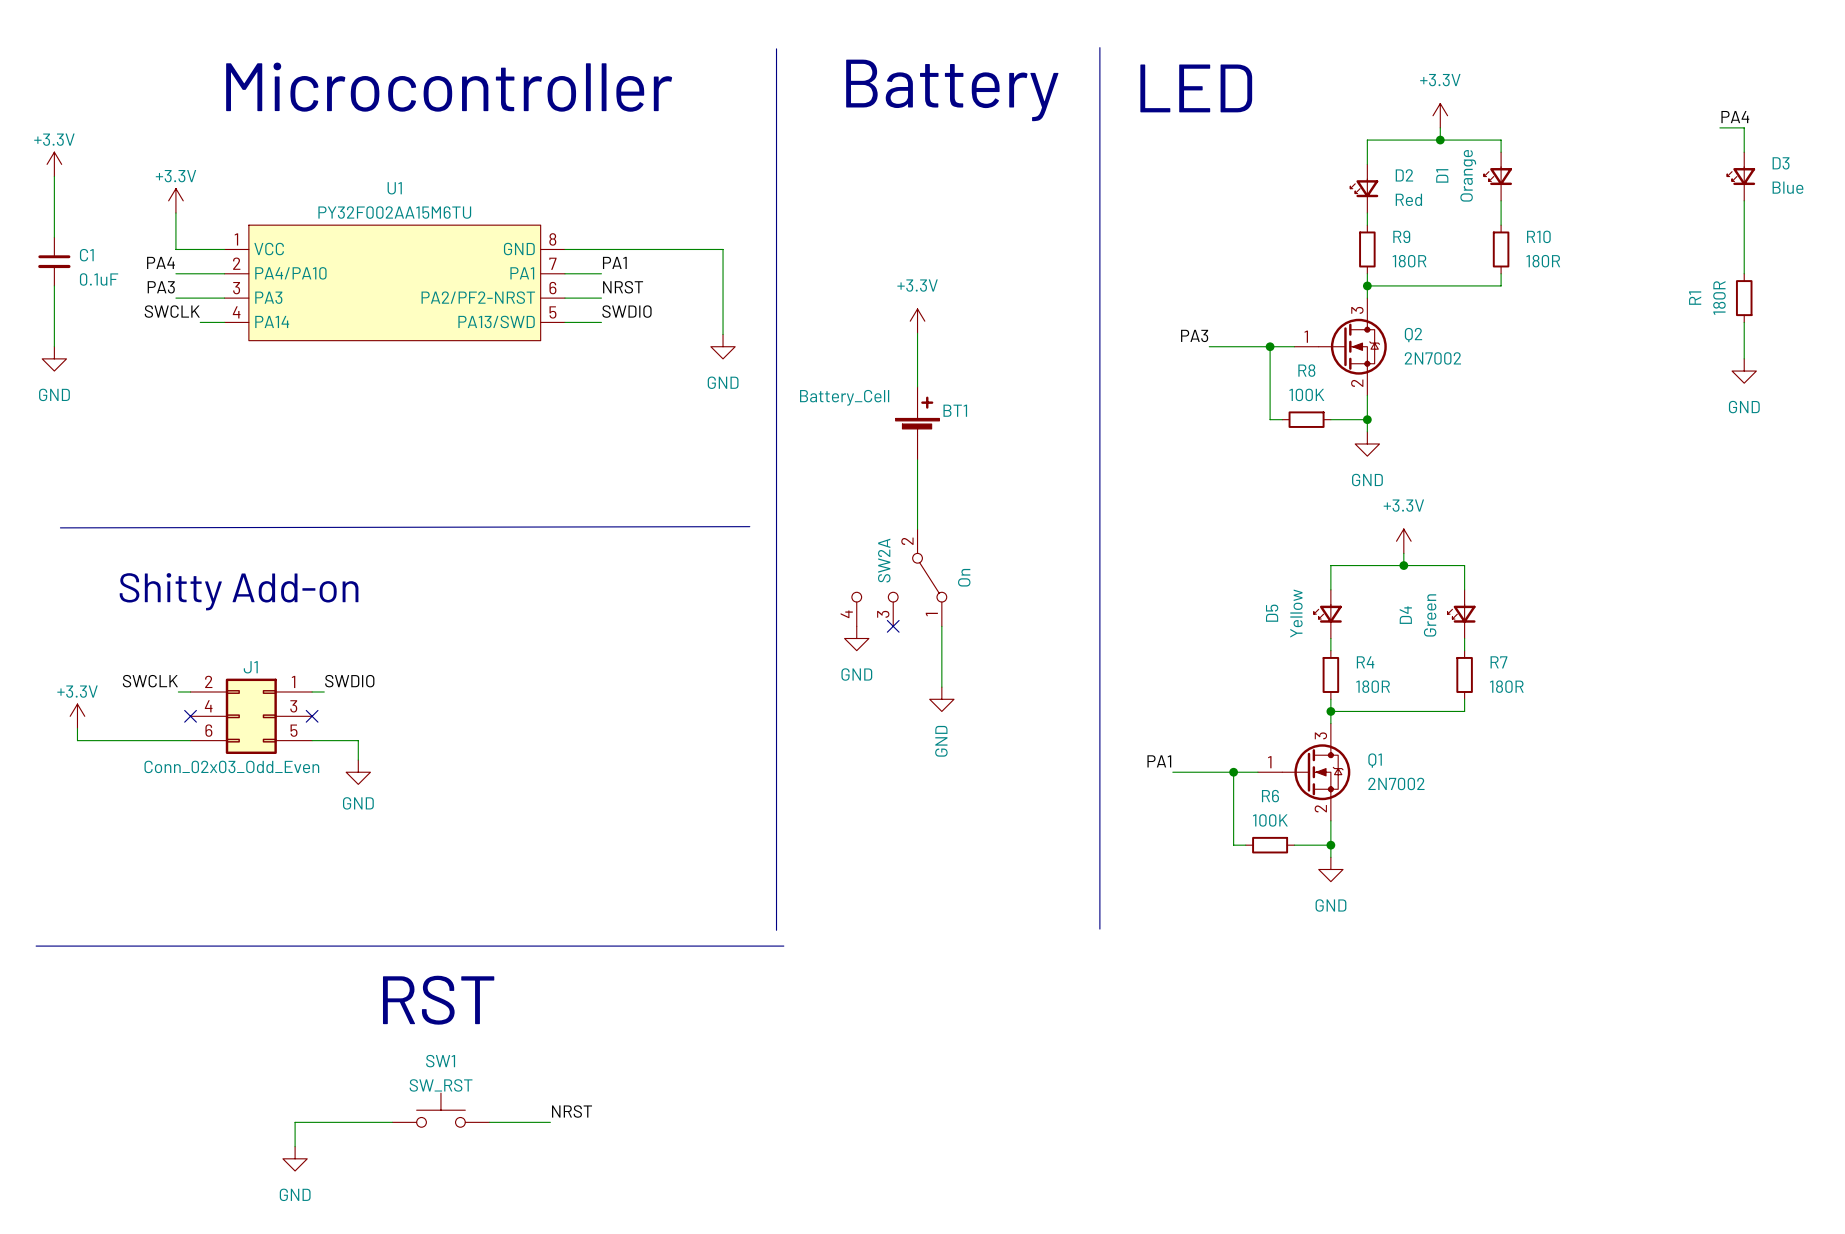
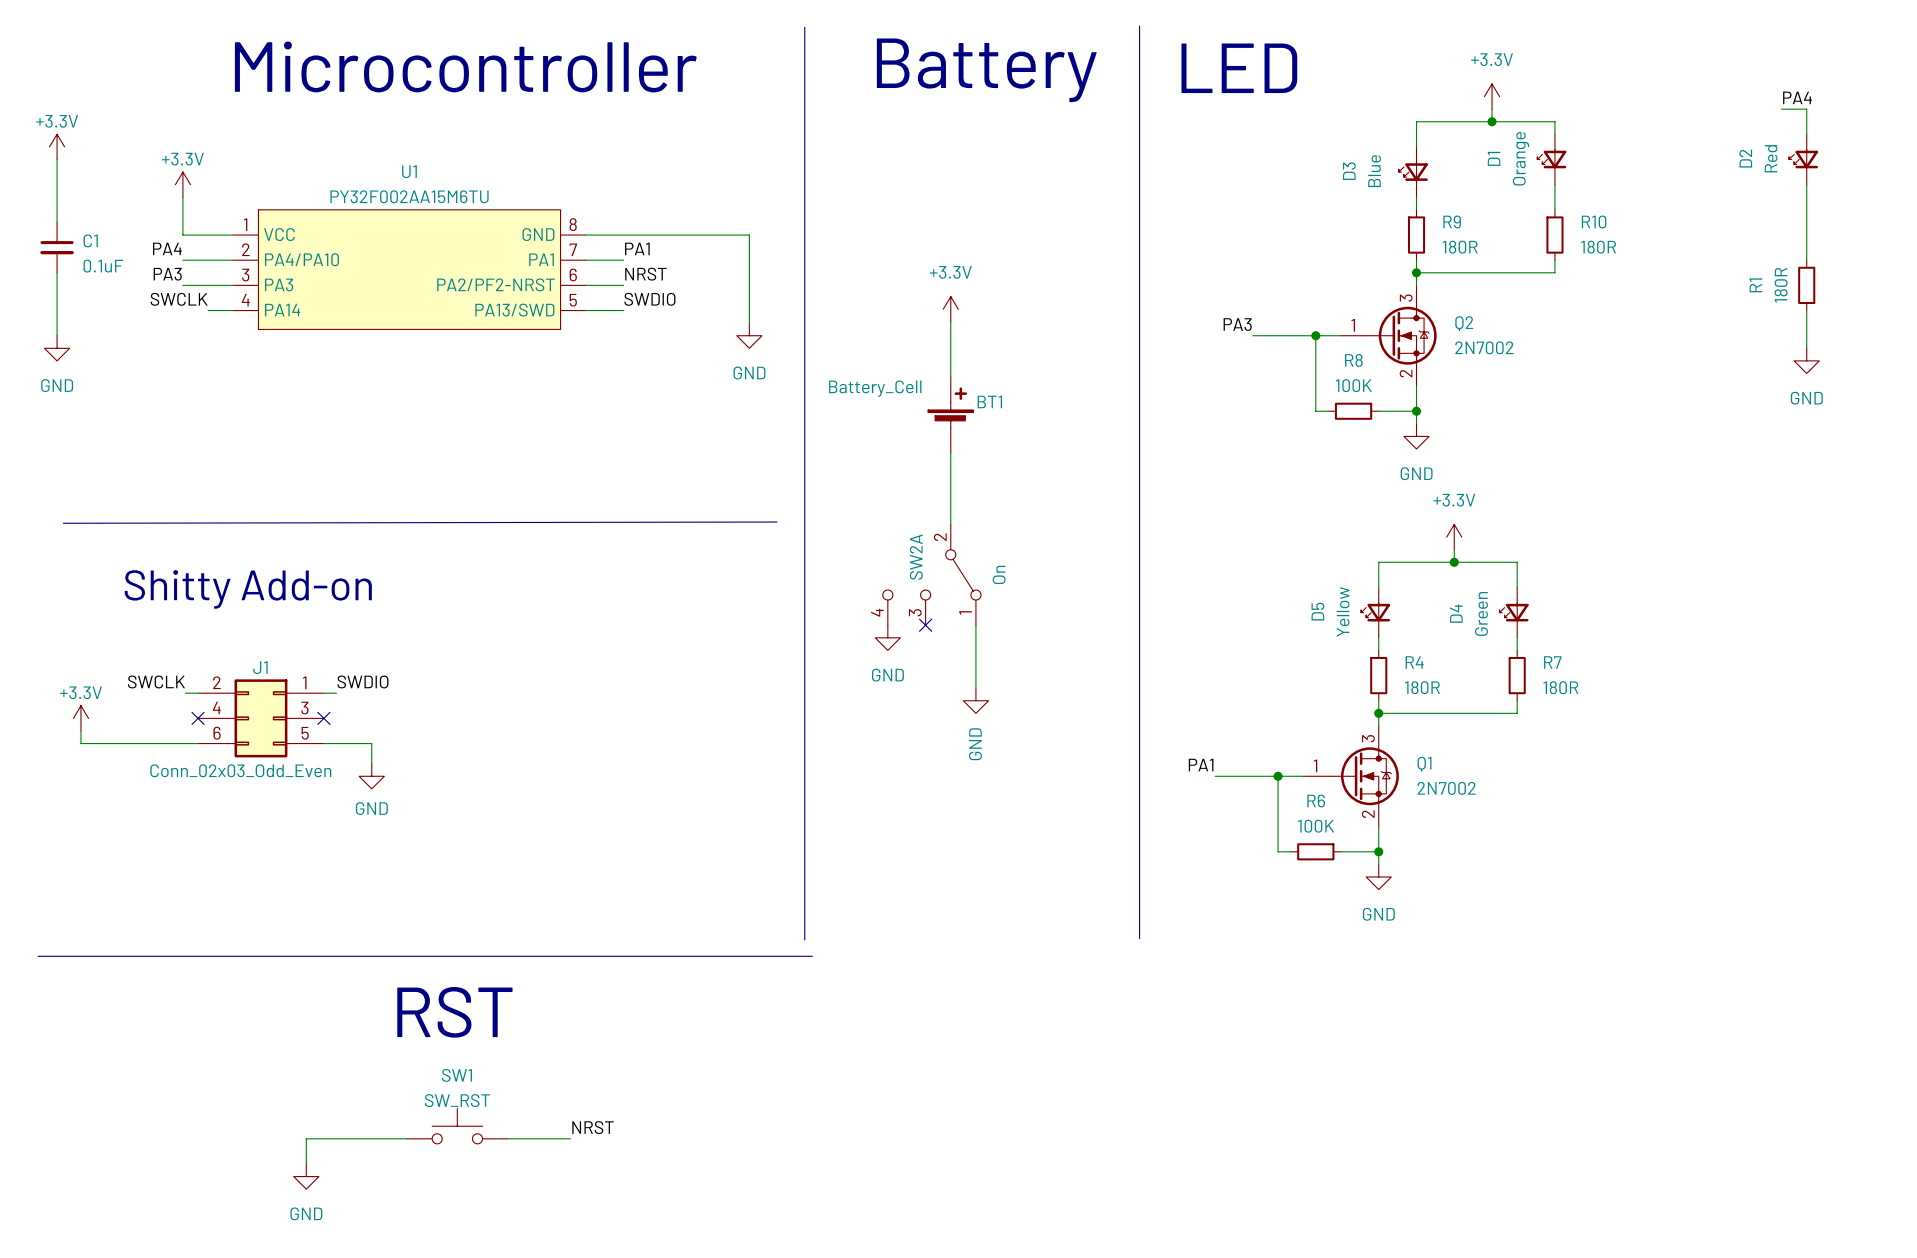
D3 name: D3 (1781, 163) -> D2 (1745, 158)
D2 name: D2 (1404, 175) -> D3 (1349, 171)
D3 value: Blue (1787, 187) -> Red (1771, 158)
D2 value: Red (1408, 199) -> Blue (1374, 171)

